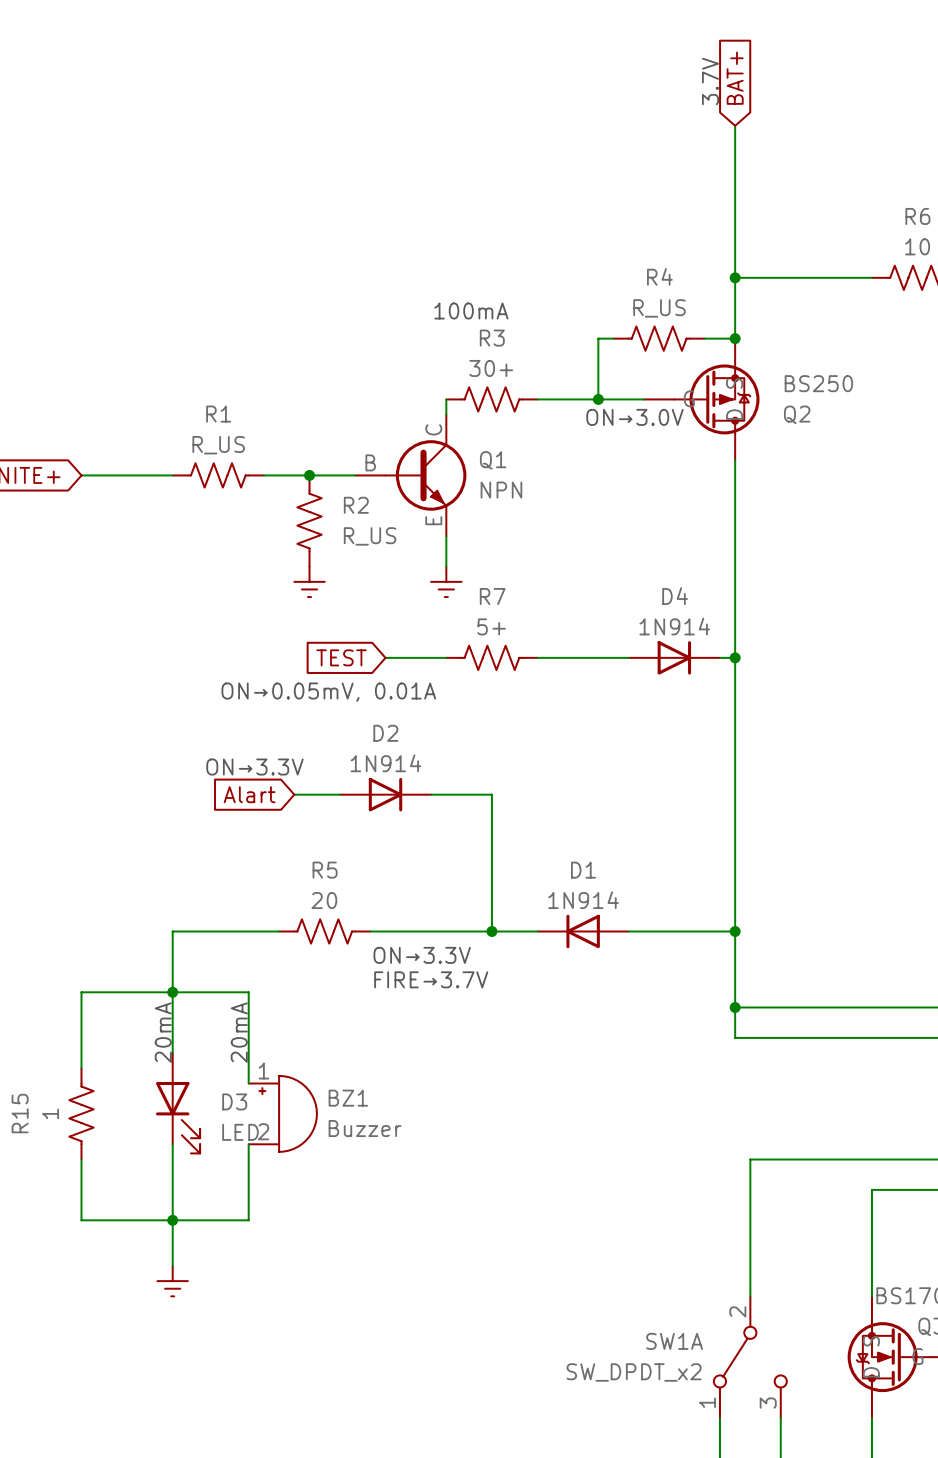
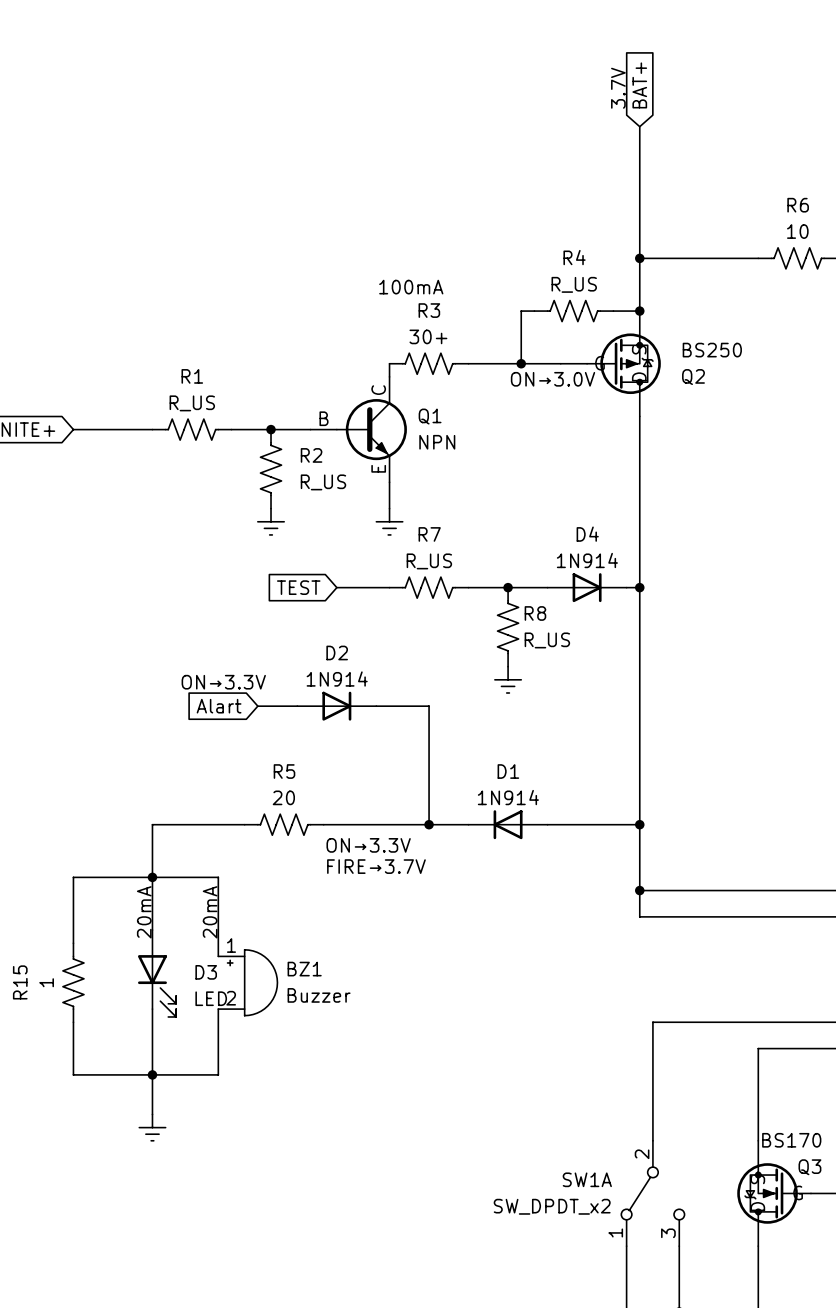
R7 value: 5+ (491, 626) -> R_US (429, 561)
junction: none -> (508, 587)
text: ON→0.05mV, 0.01A (328, 692) -> none
R8: none -> R_US (508, 627)
power symbol: none -> (508, 679)

